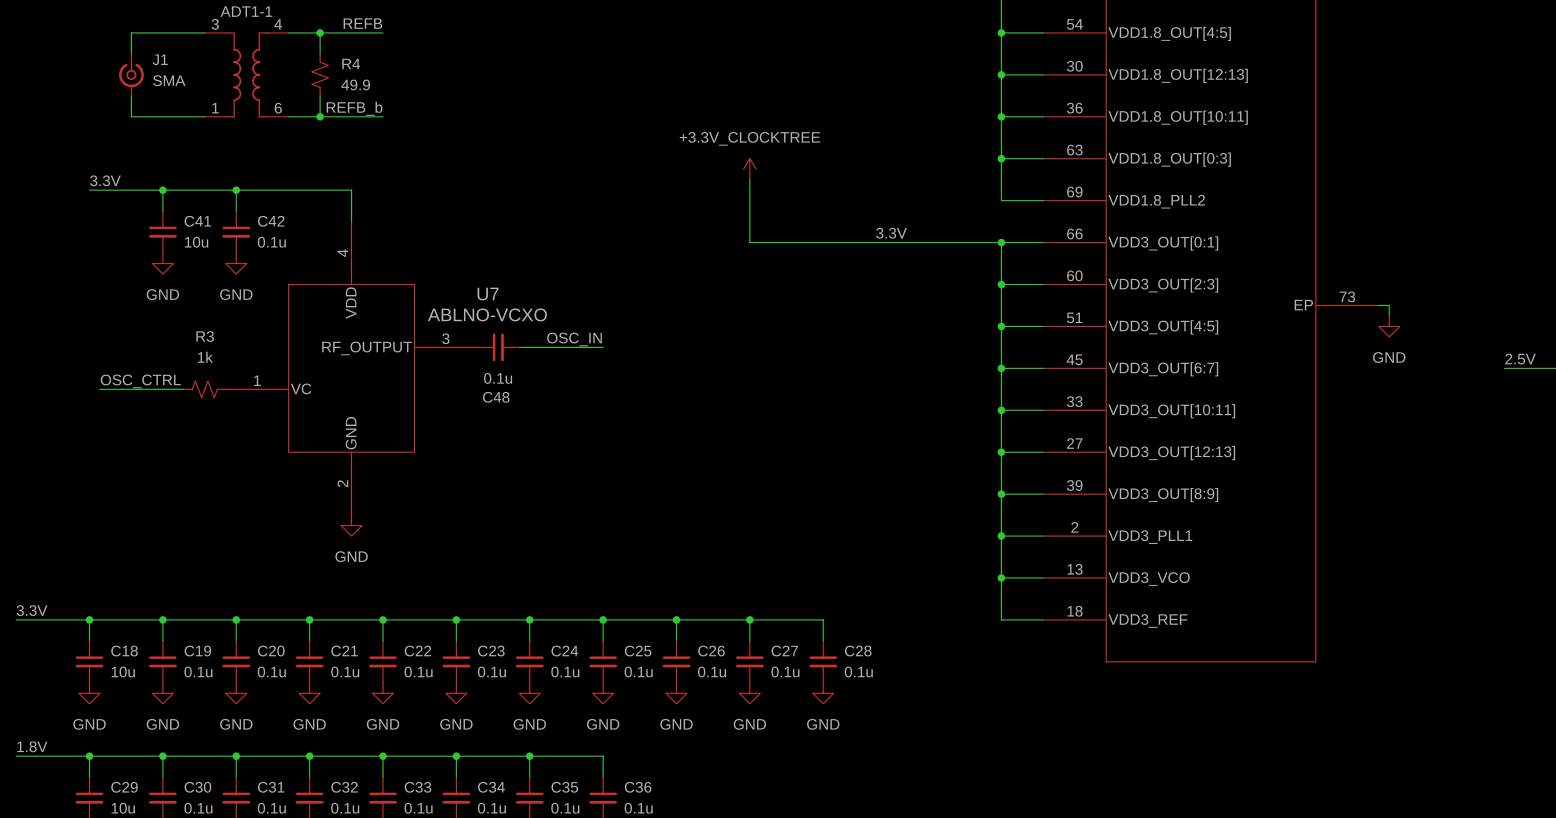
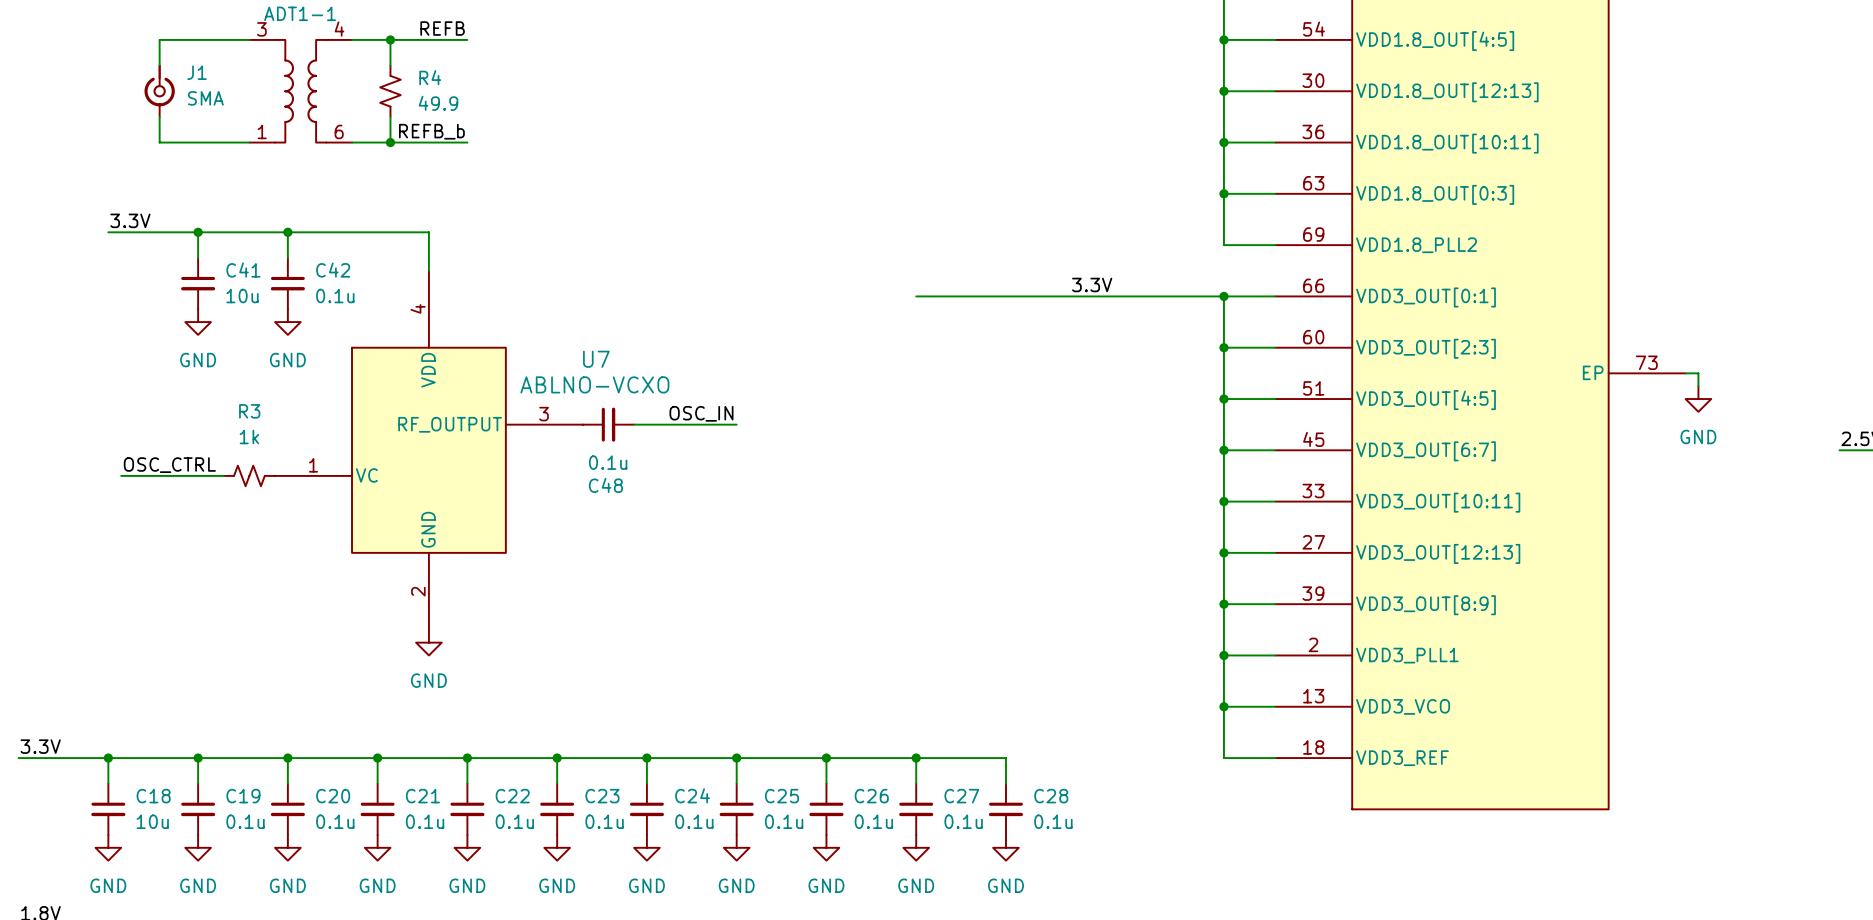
power symbol: +3.3V_CLOCKTREE (749, 169) -> none
wire: (749, 179) (749, 242) -> none

